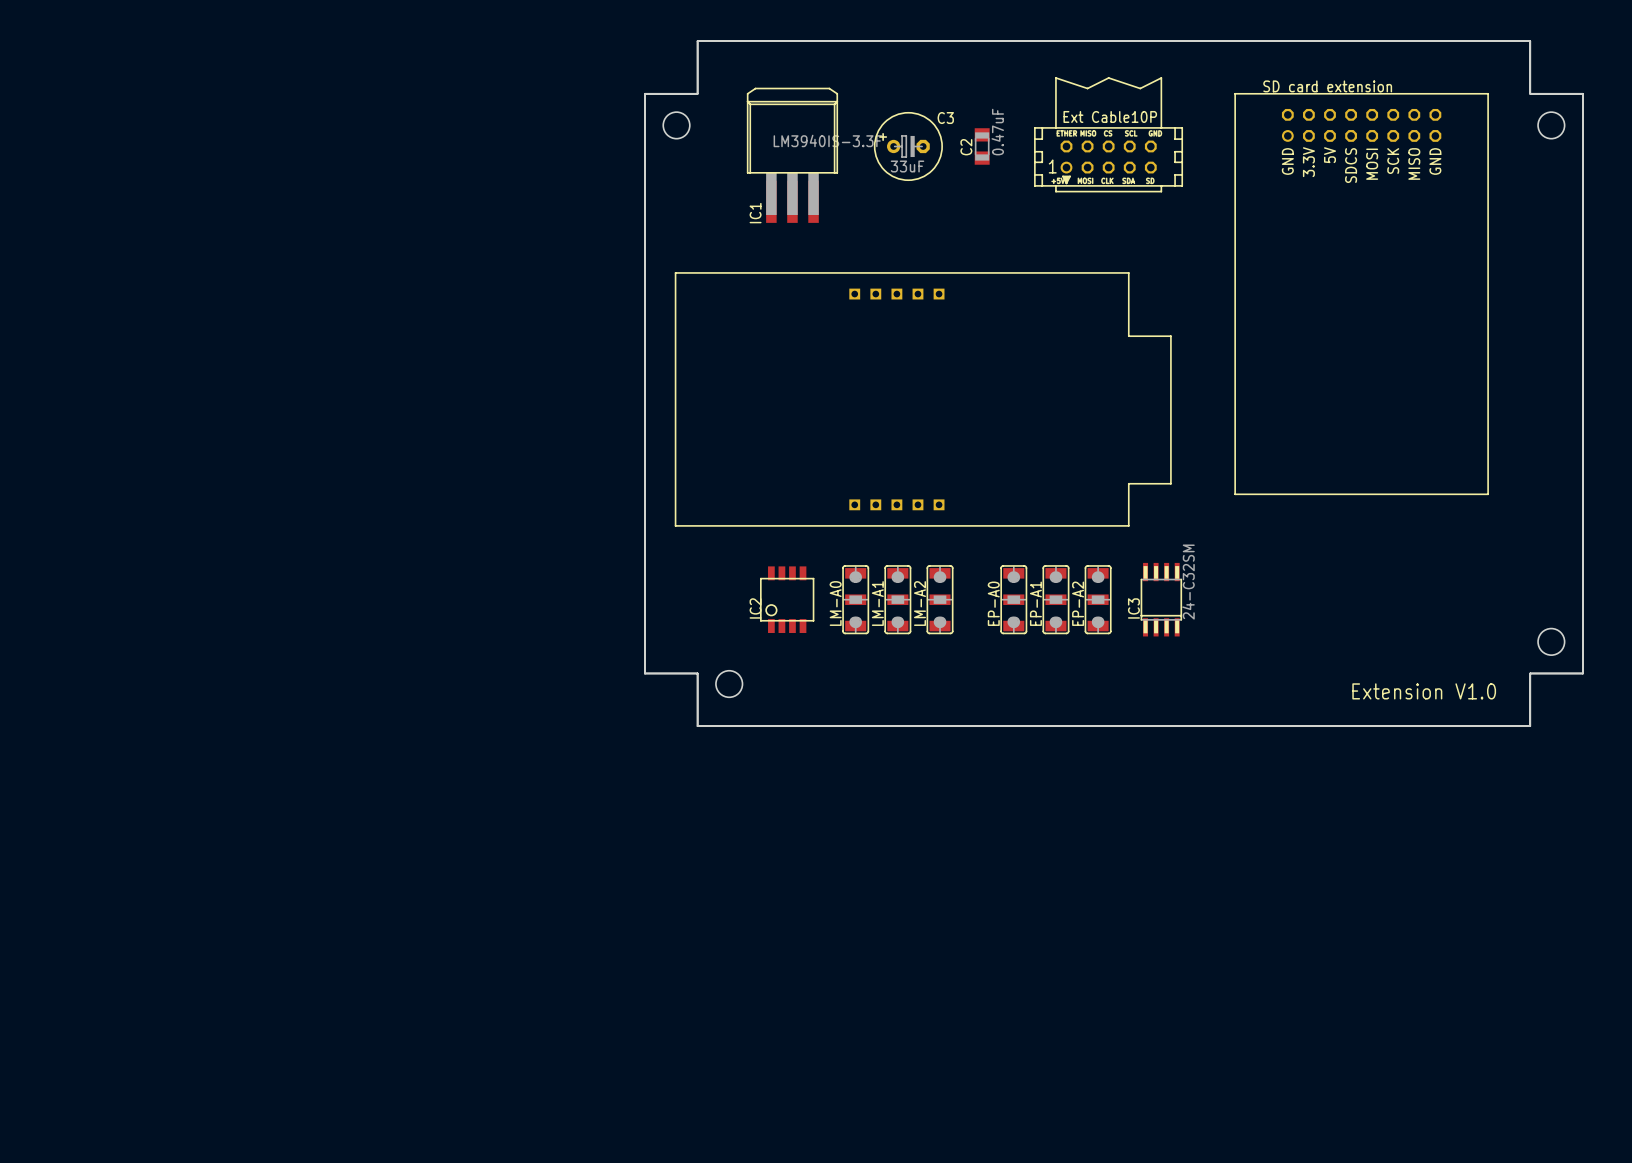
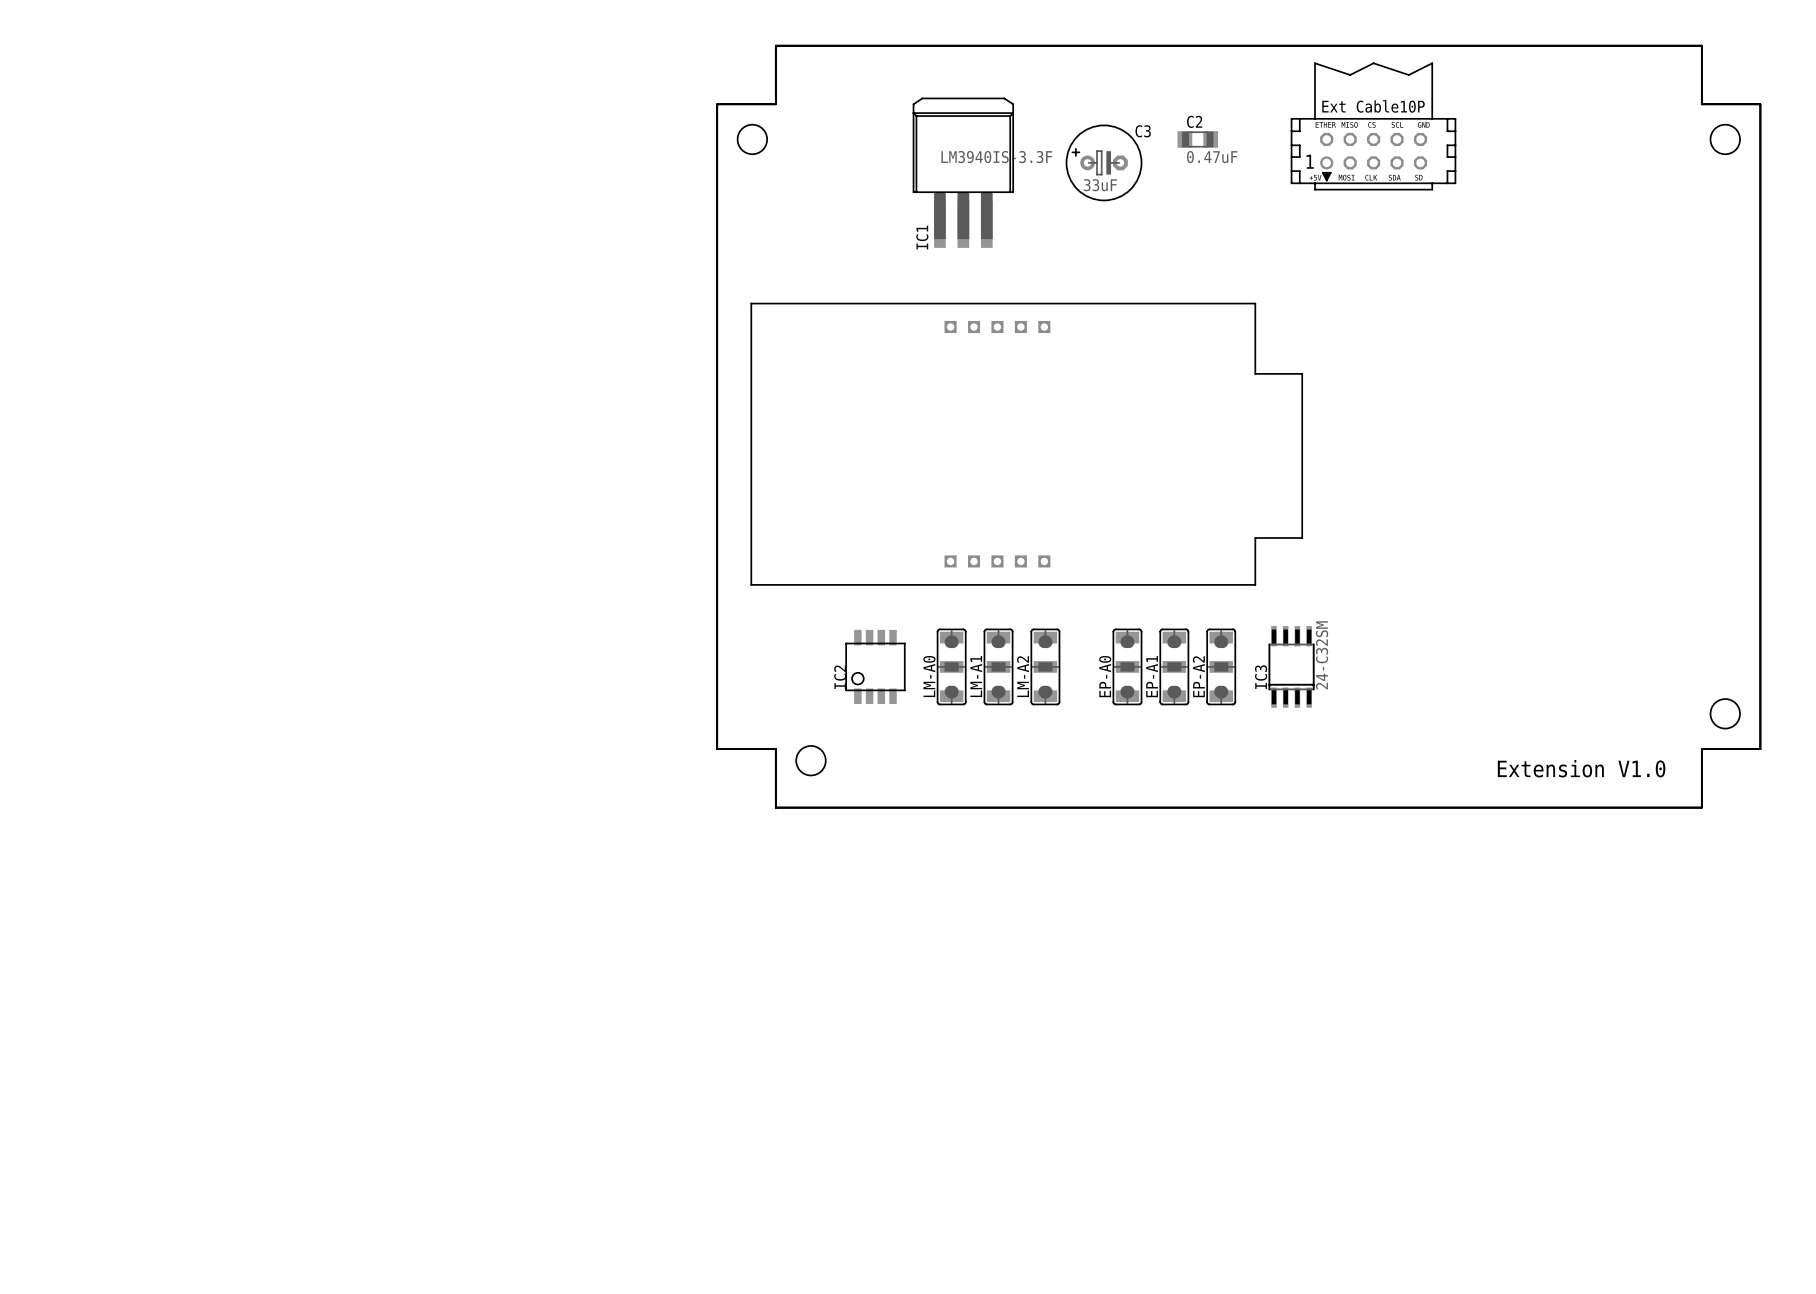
part position: (1108, 134) -> (1373, 126)
C3 position: (908, 146) -> (1104, 162)
C2 rotation: 0° (982, 146) -> 90° clockwise (1197, 139)
C2 position: (982, 146) -> (1197, 139)
IC1 position: (792, 155) -> (963, 172)
part: (1361, 294) -> none

